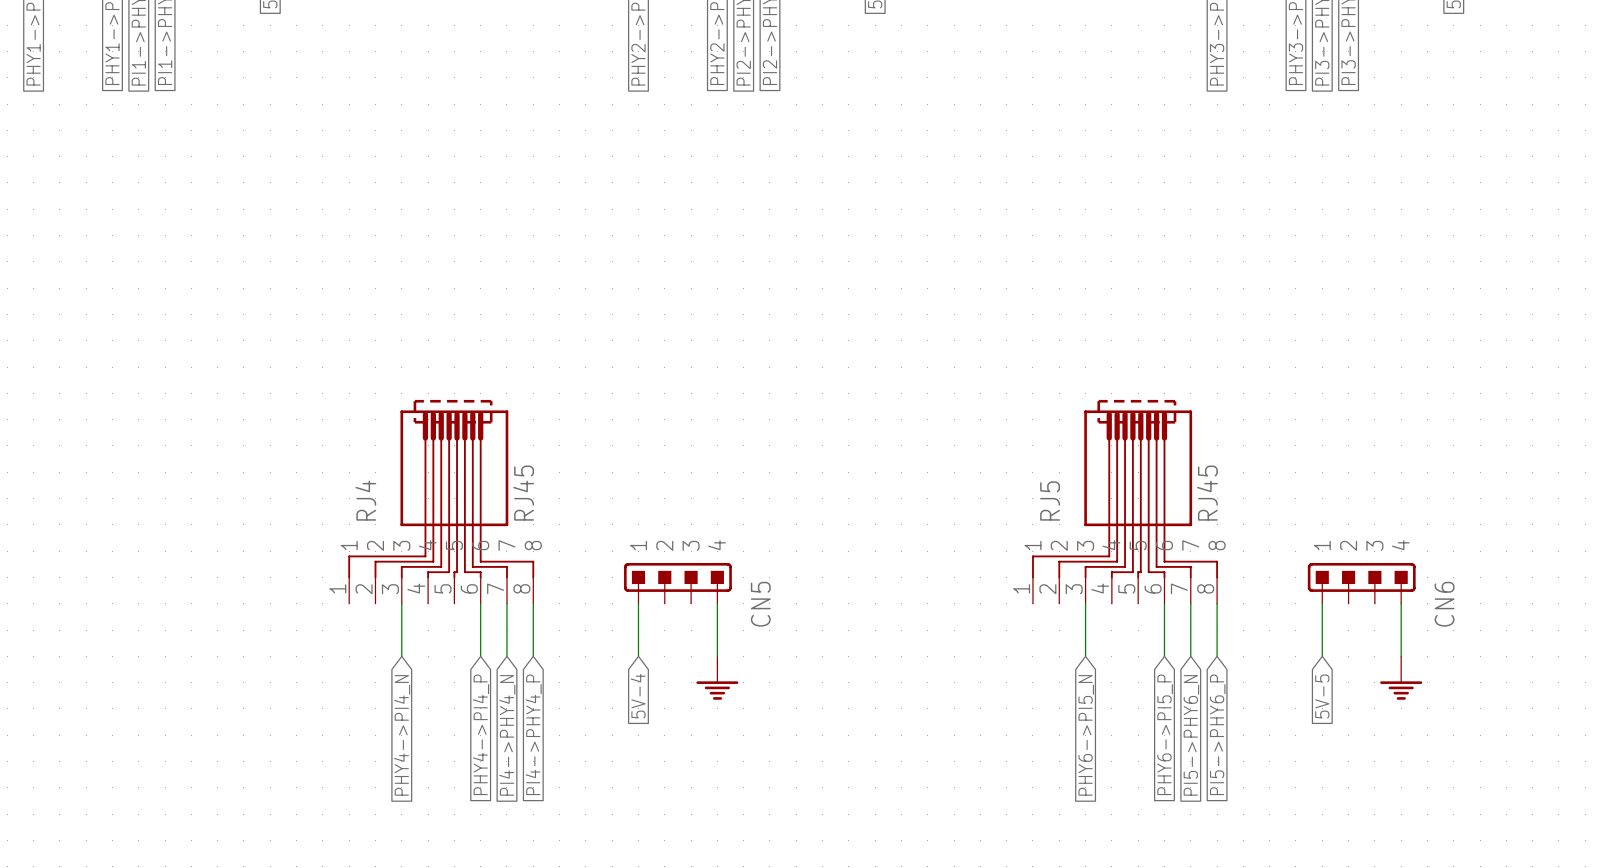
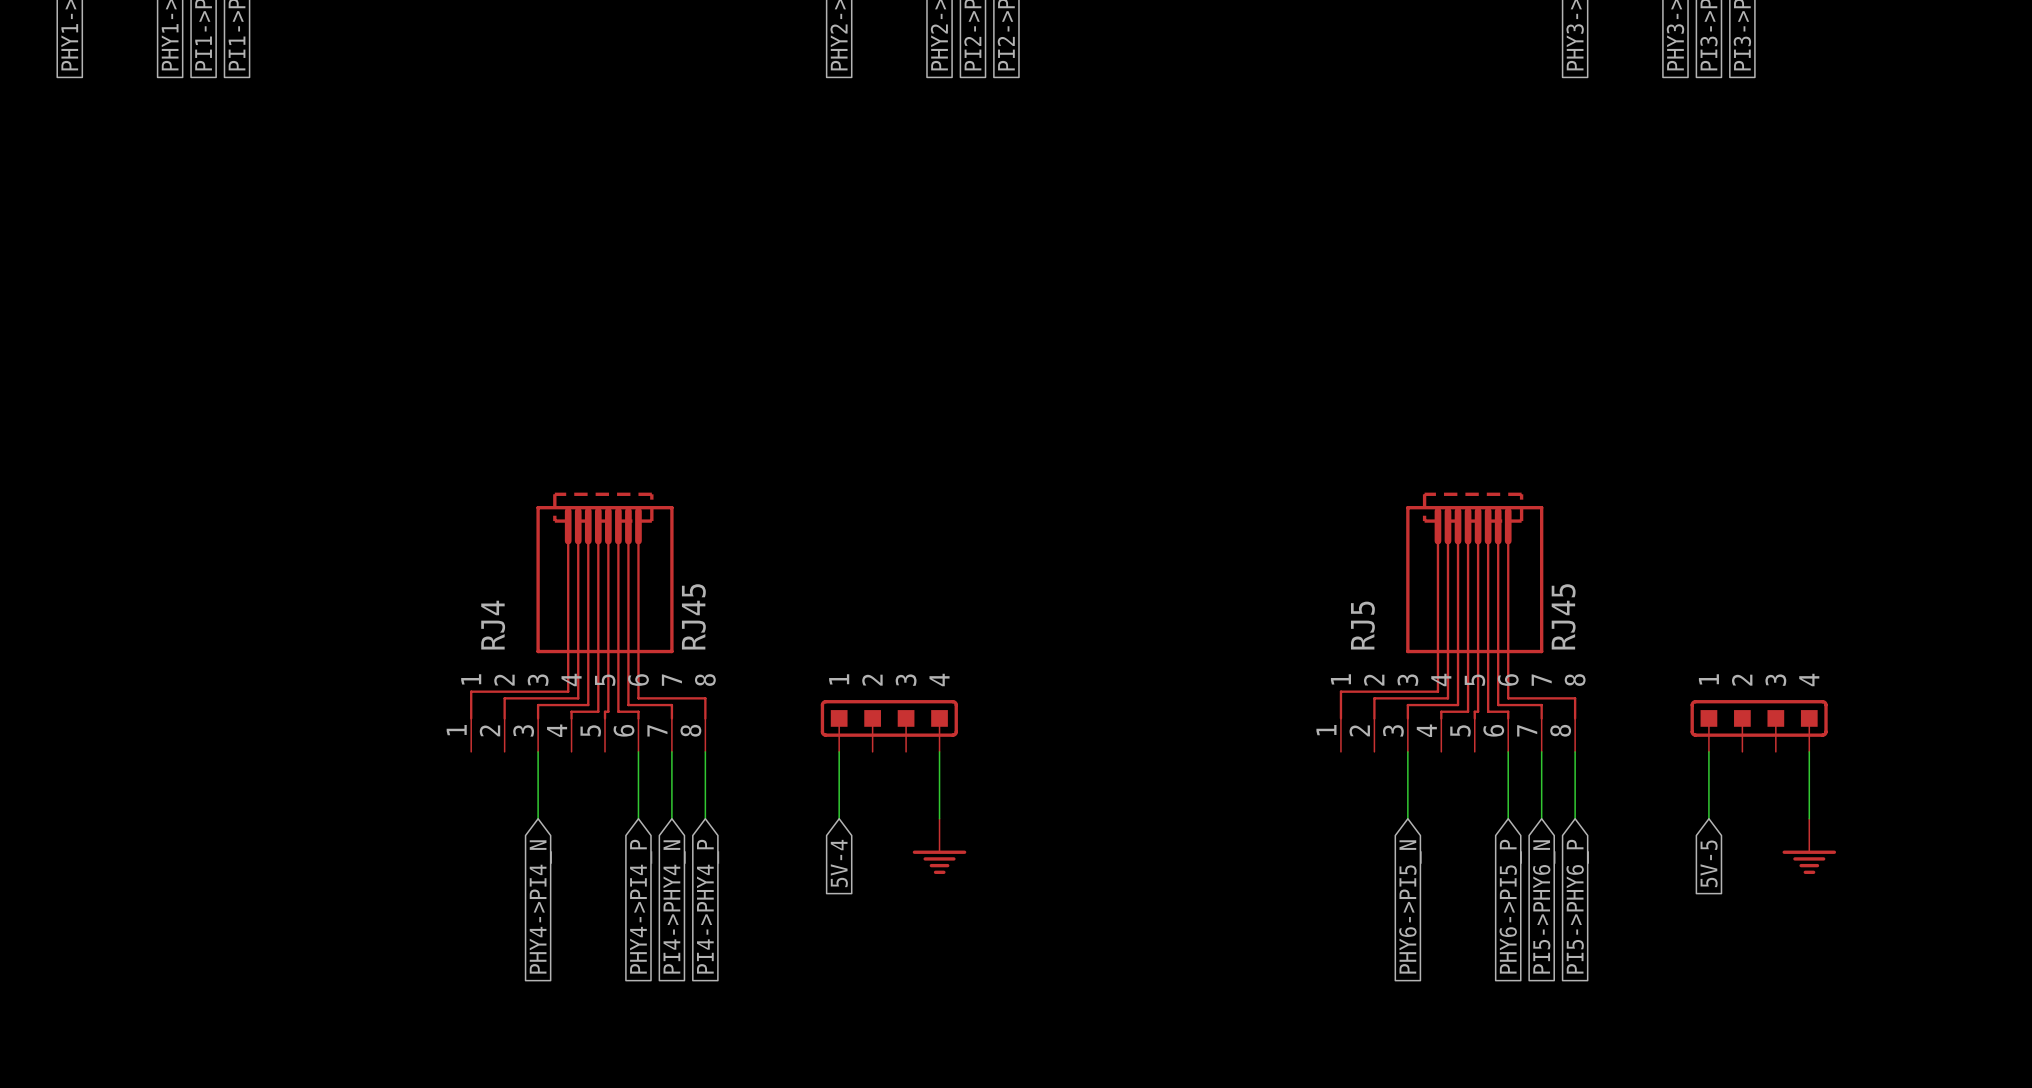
CN5 name: CN5 (760, 604) -> none
CN6 name: CN6 (1444, 604) -> none

